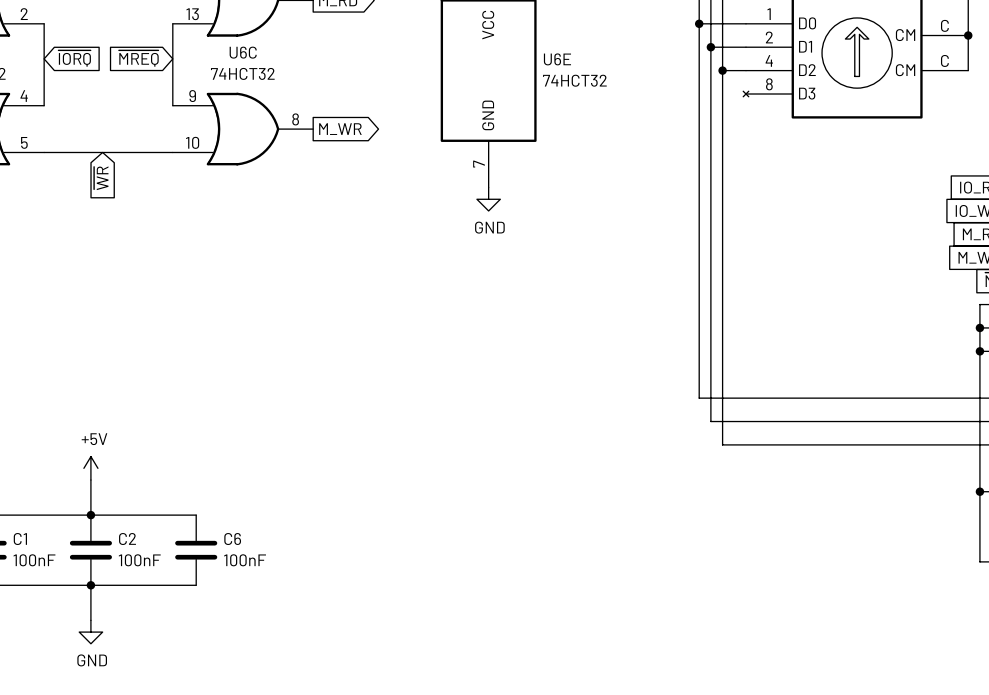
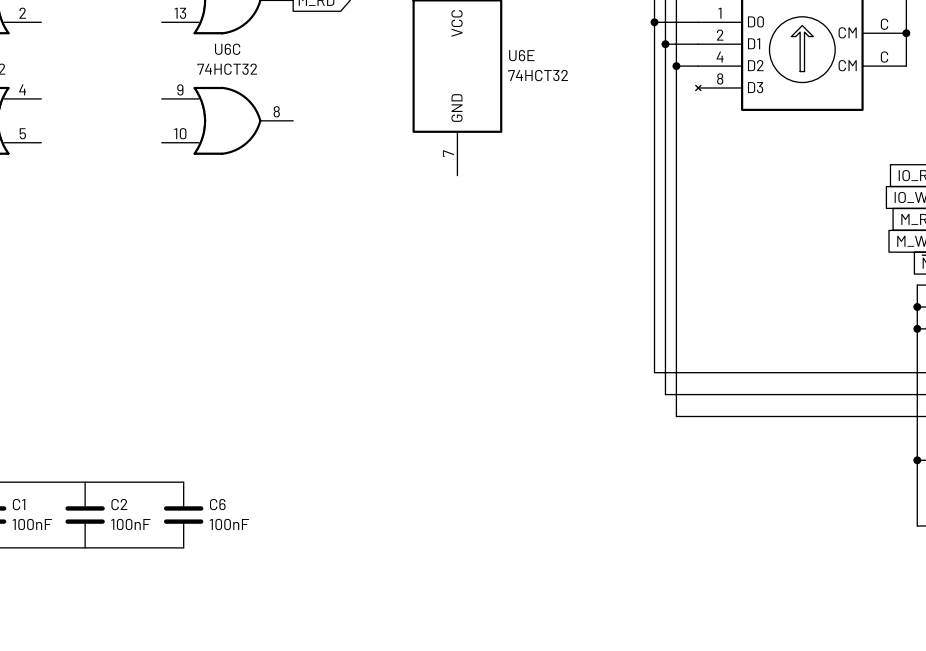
wire: (44, 23) (44, 105) -> none
wire: (172, 23) (172, 105) -> none
global label: ~{IORQ} (74, 58) -> none
global label: ~{MREQ} (138, 58) -> none
global label: M_WR (340, 129) -> none
wire: (44, 152) (172, 152) -> none
global label: ~{WR} (101, 178) -> none
power symbol: GND (488, 199) -> none
power symbol: +5V (90, 468) -> none
wire: (90, 480) (90, 515) -> none
junction: (90, 515) -> none
wire: (90, 585) (90, 620) -> none
junction: (90, 585) -> none
power symbol: GND (90, 632) -> none

